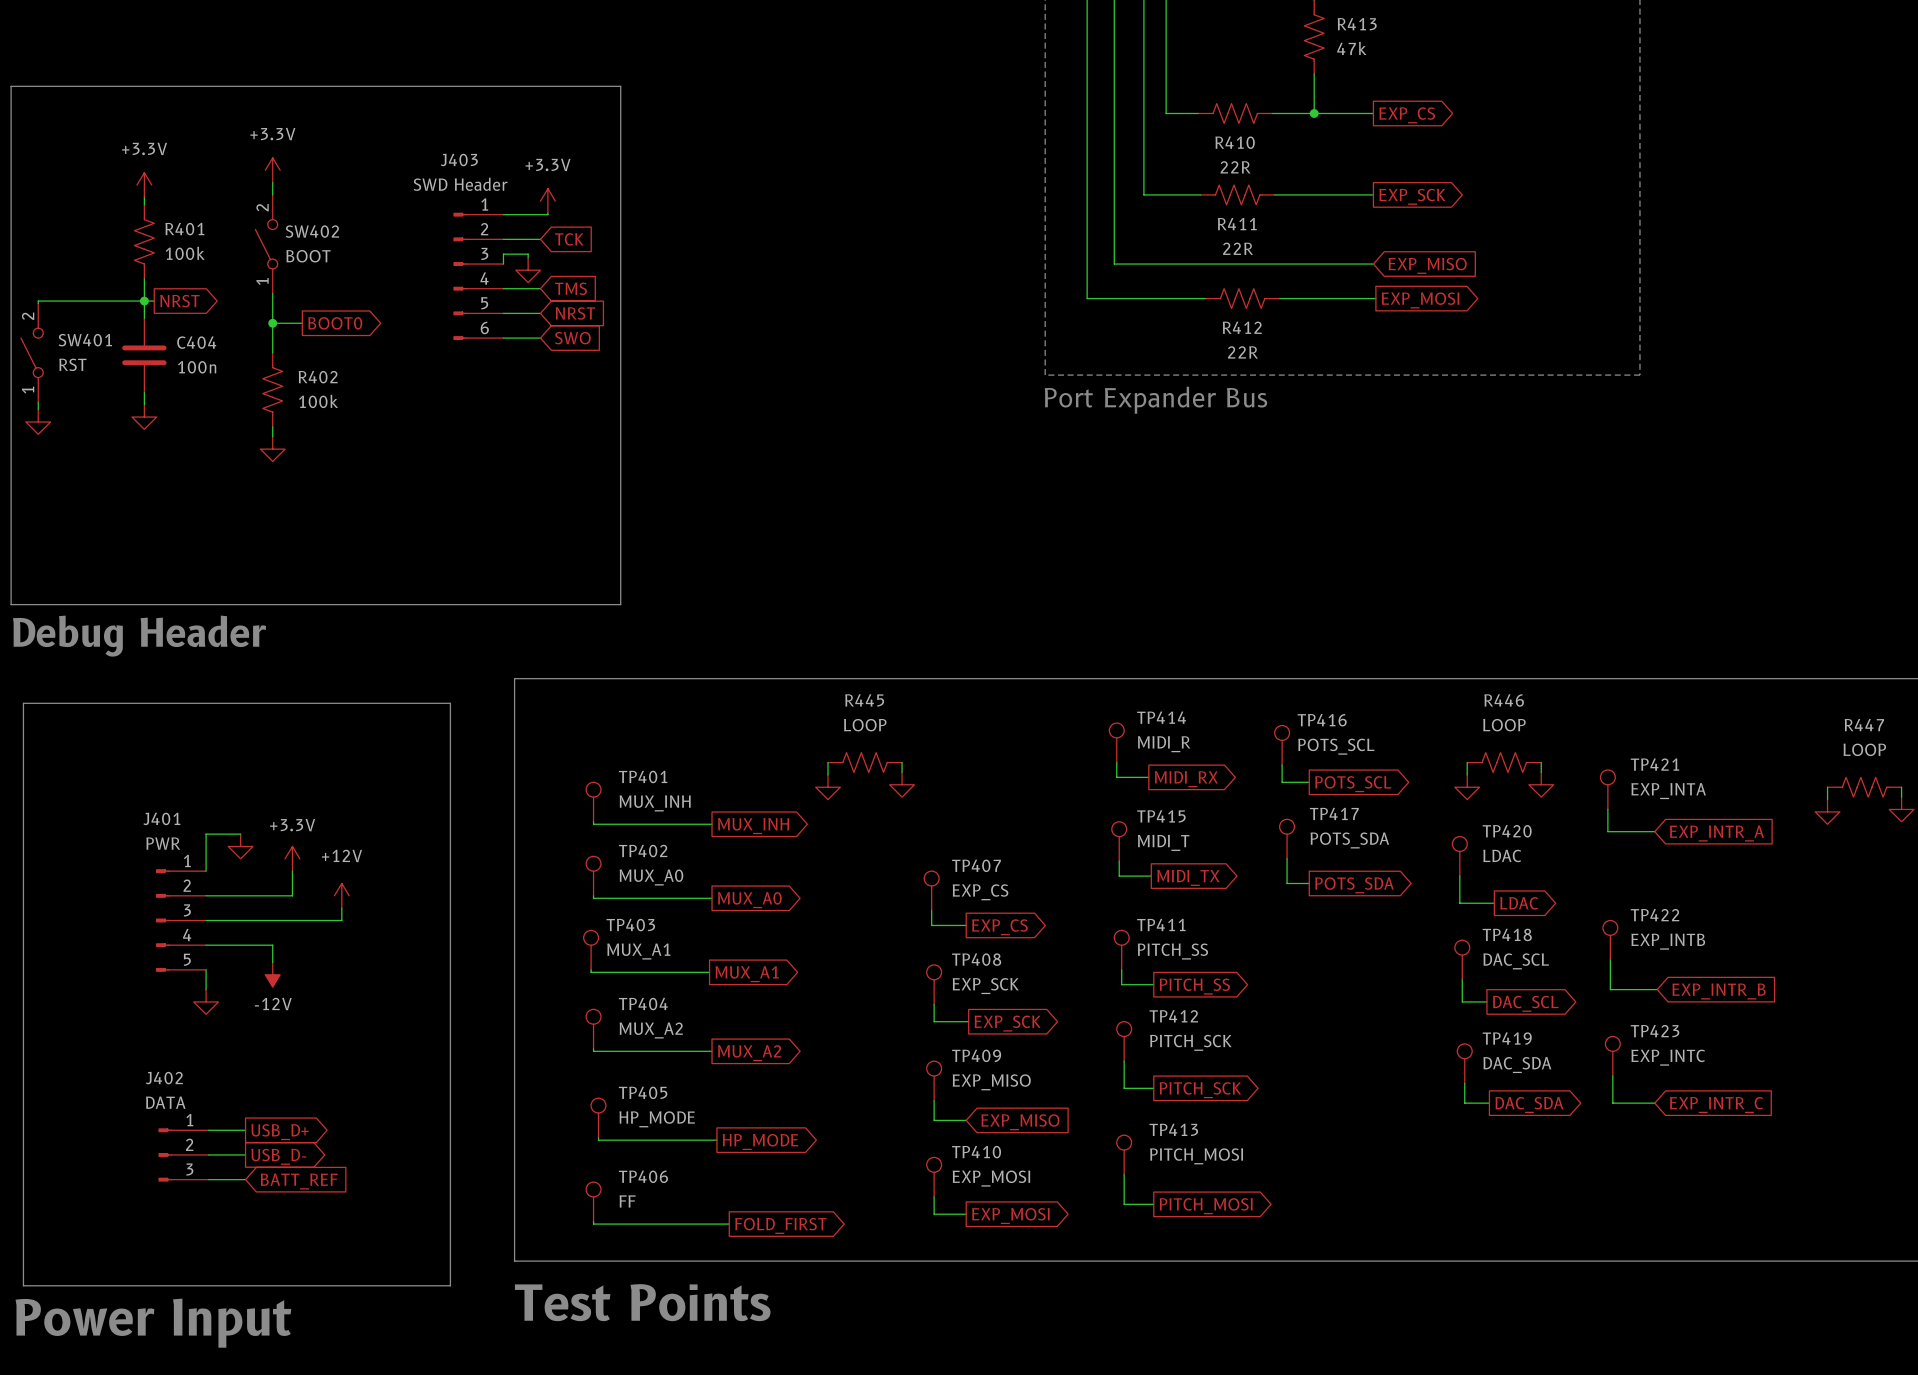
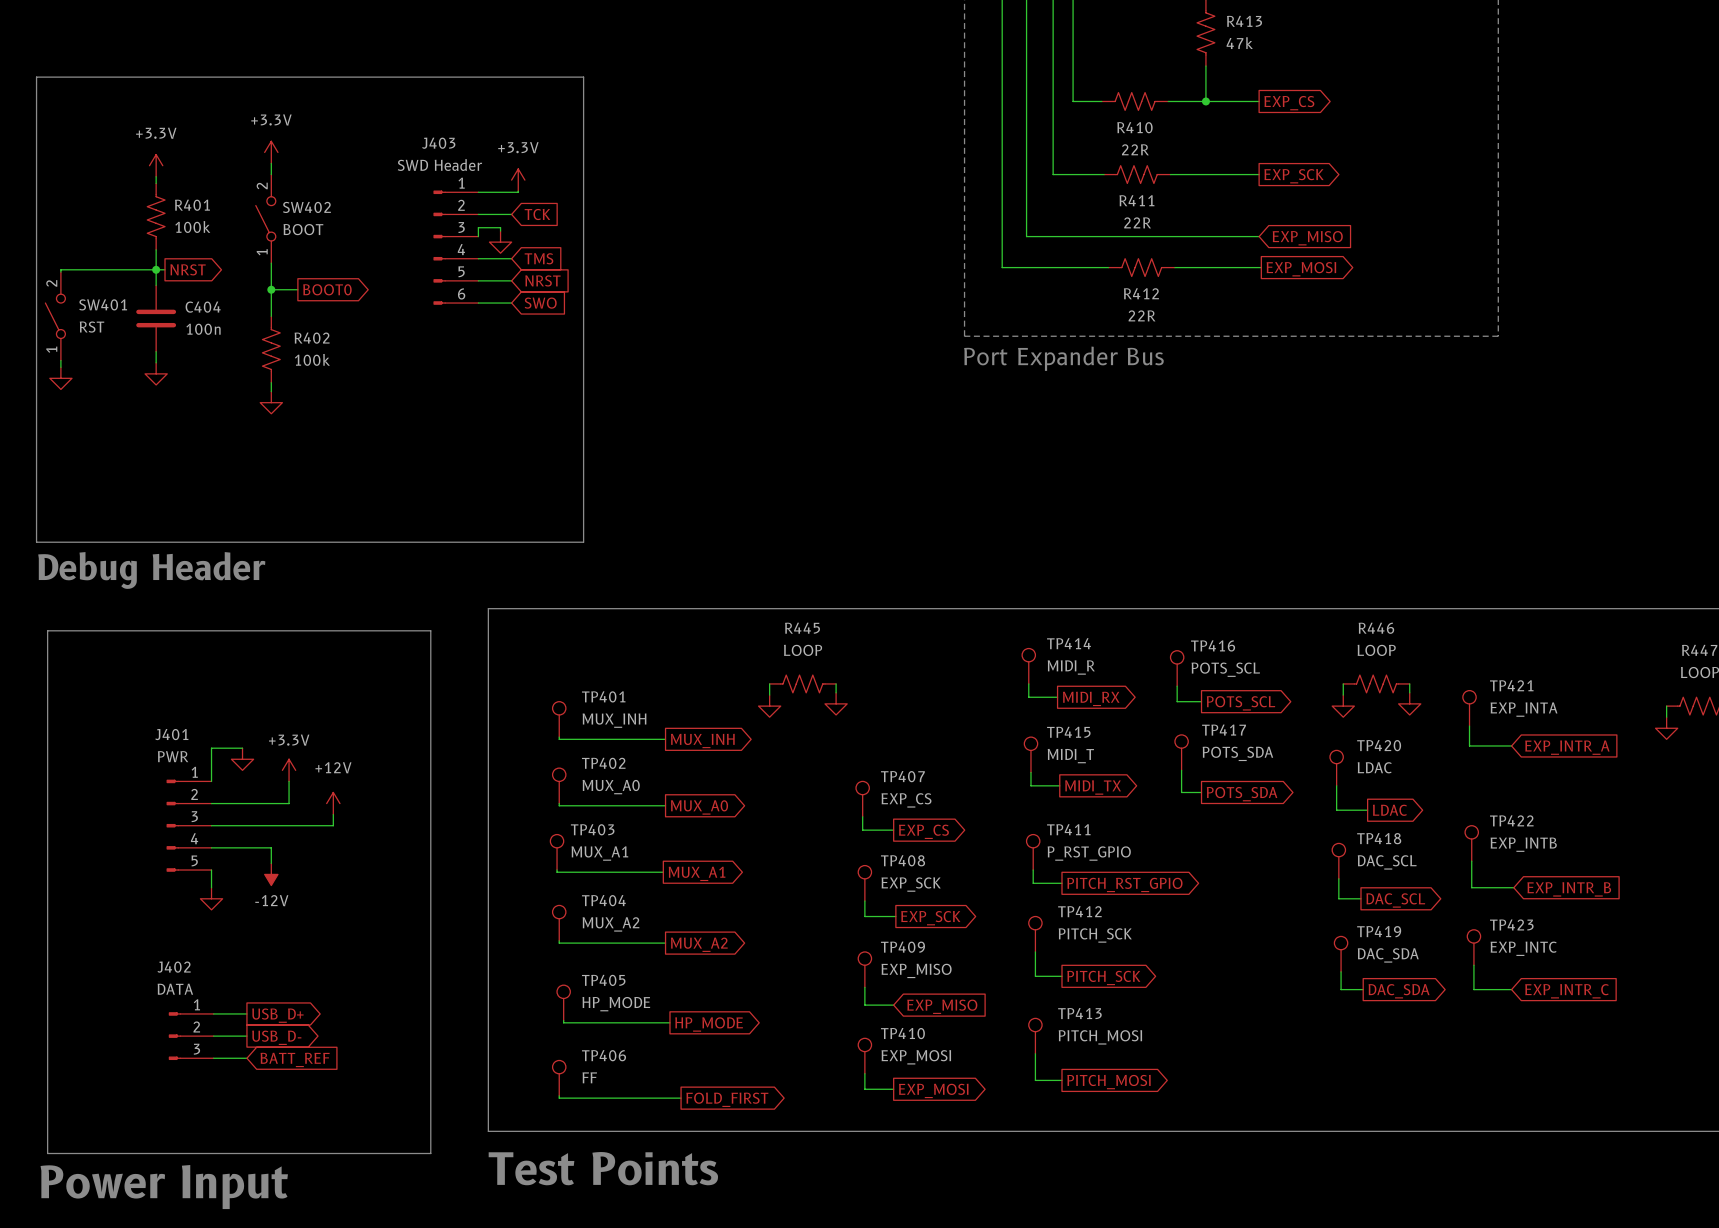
TP411 value: PITCH_SS (1172, 951) -> P_RST_GPIO (1089, 853)
global label: PITCH_SS (1194, 986) -> PITCH_RST_GPIO (1124, 884)

